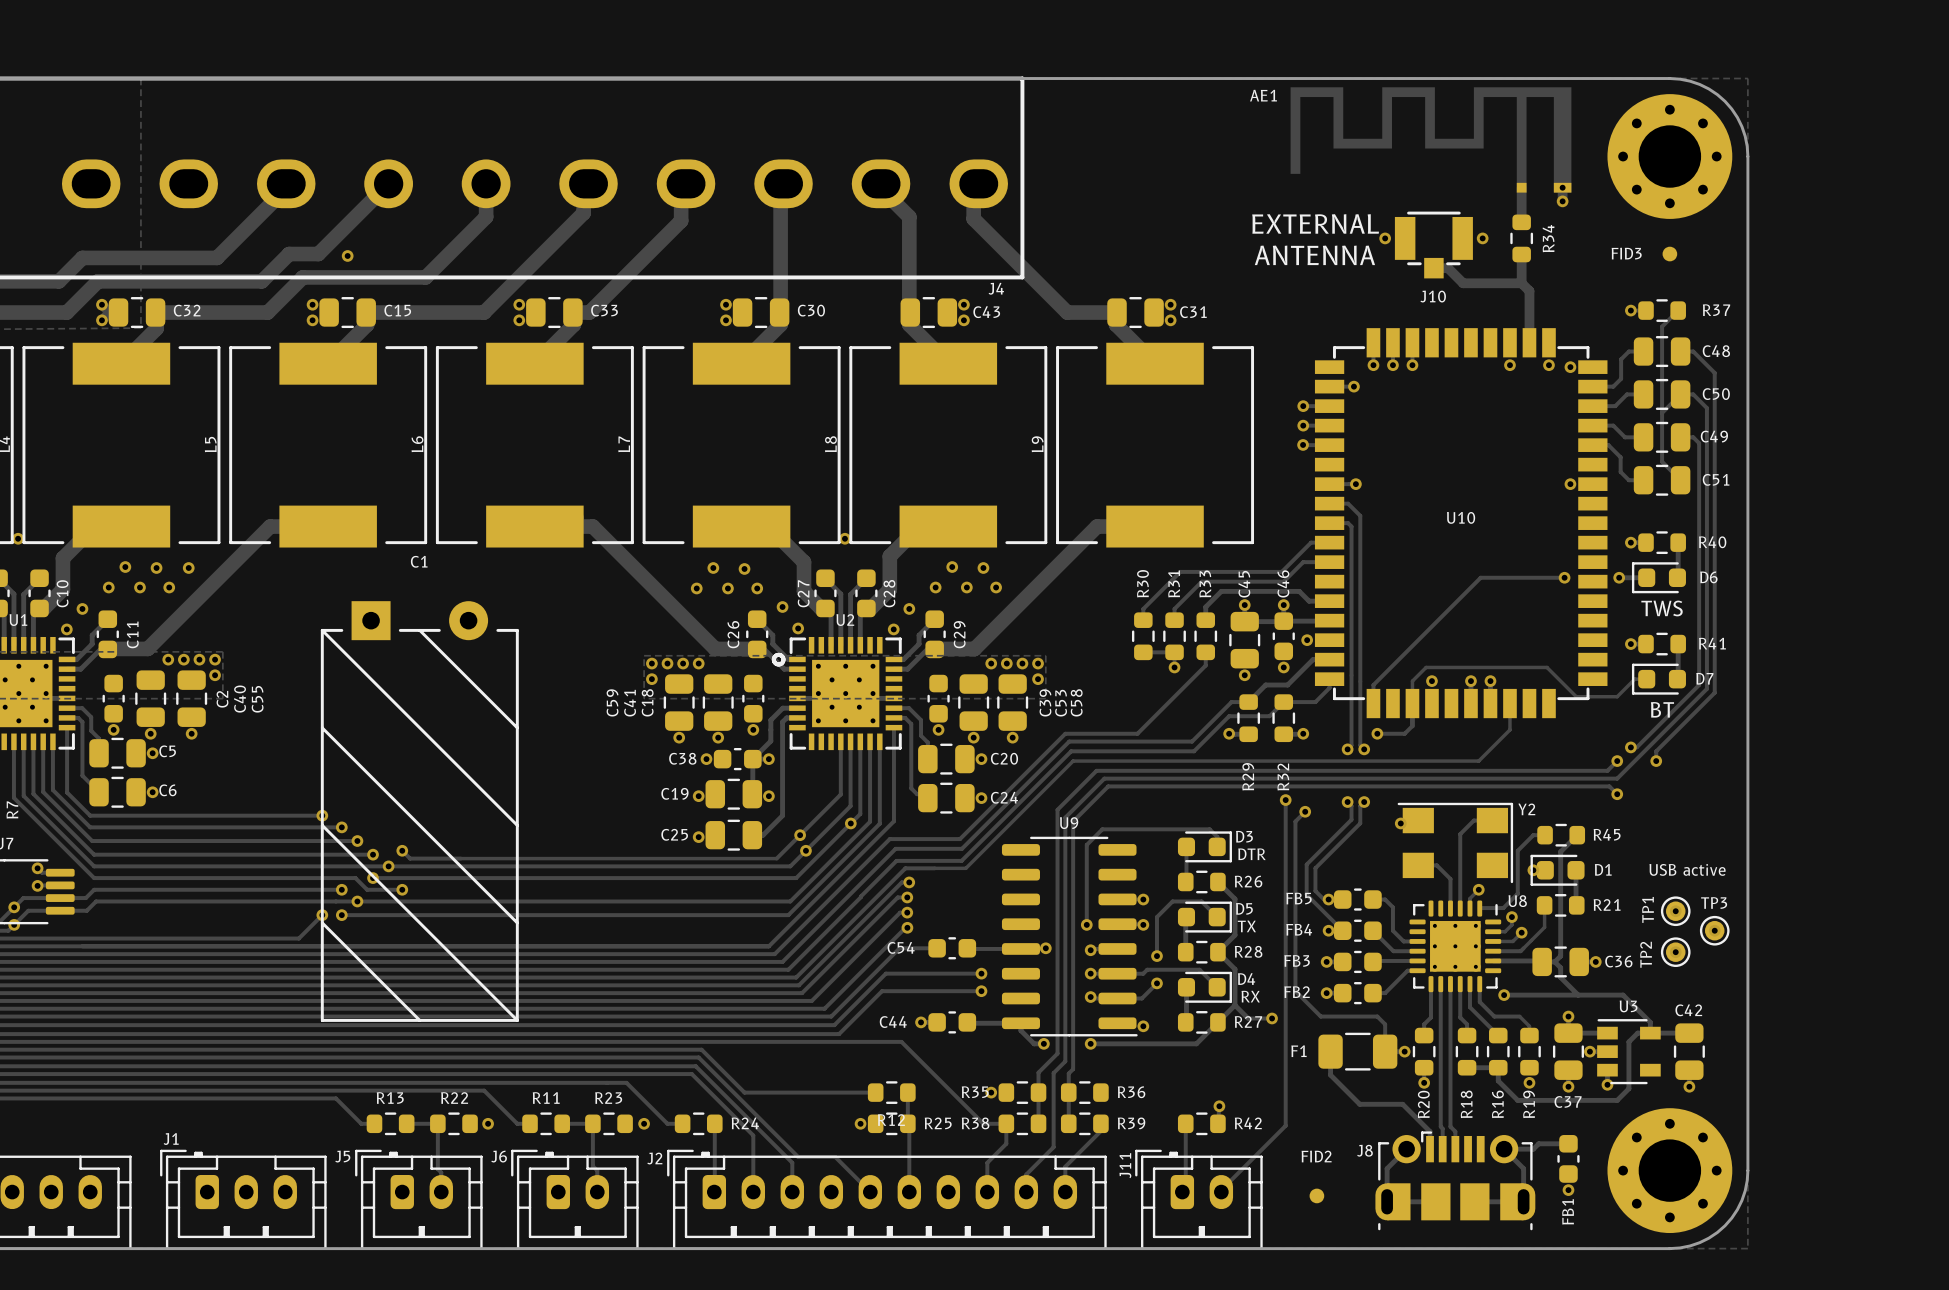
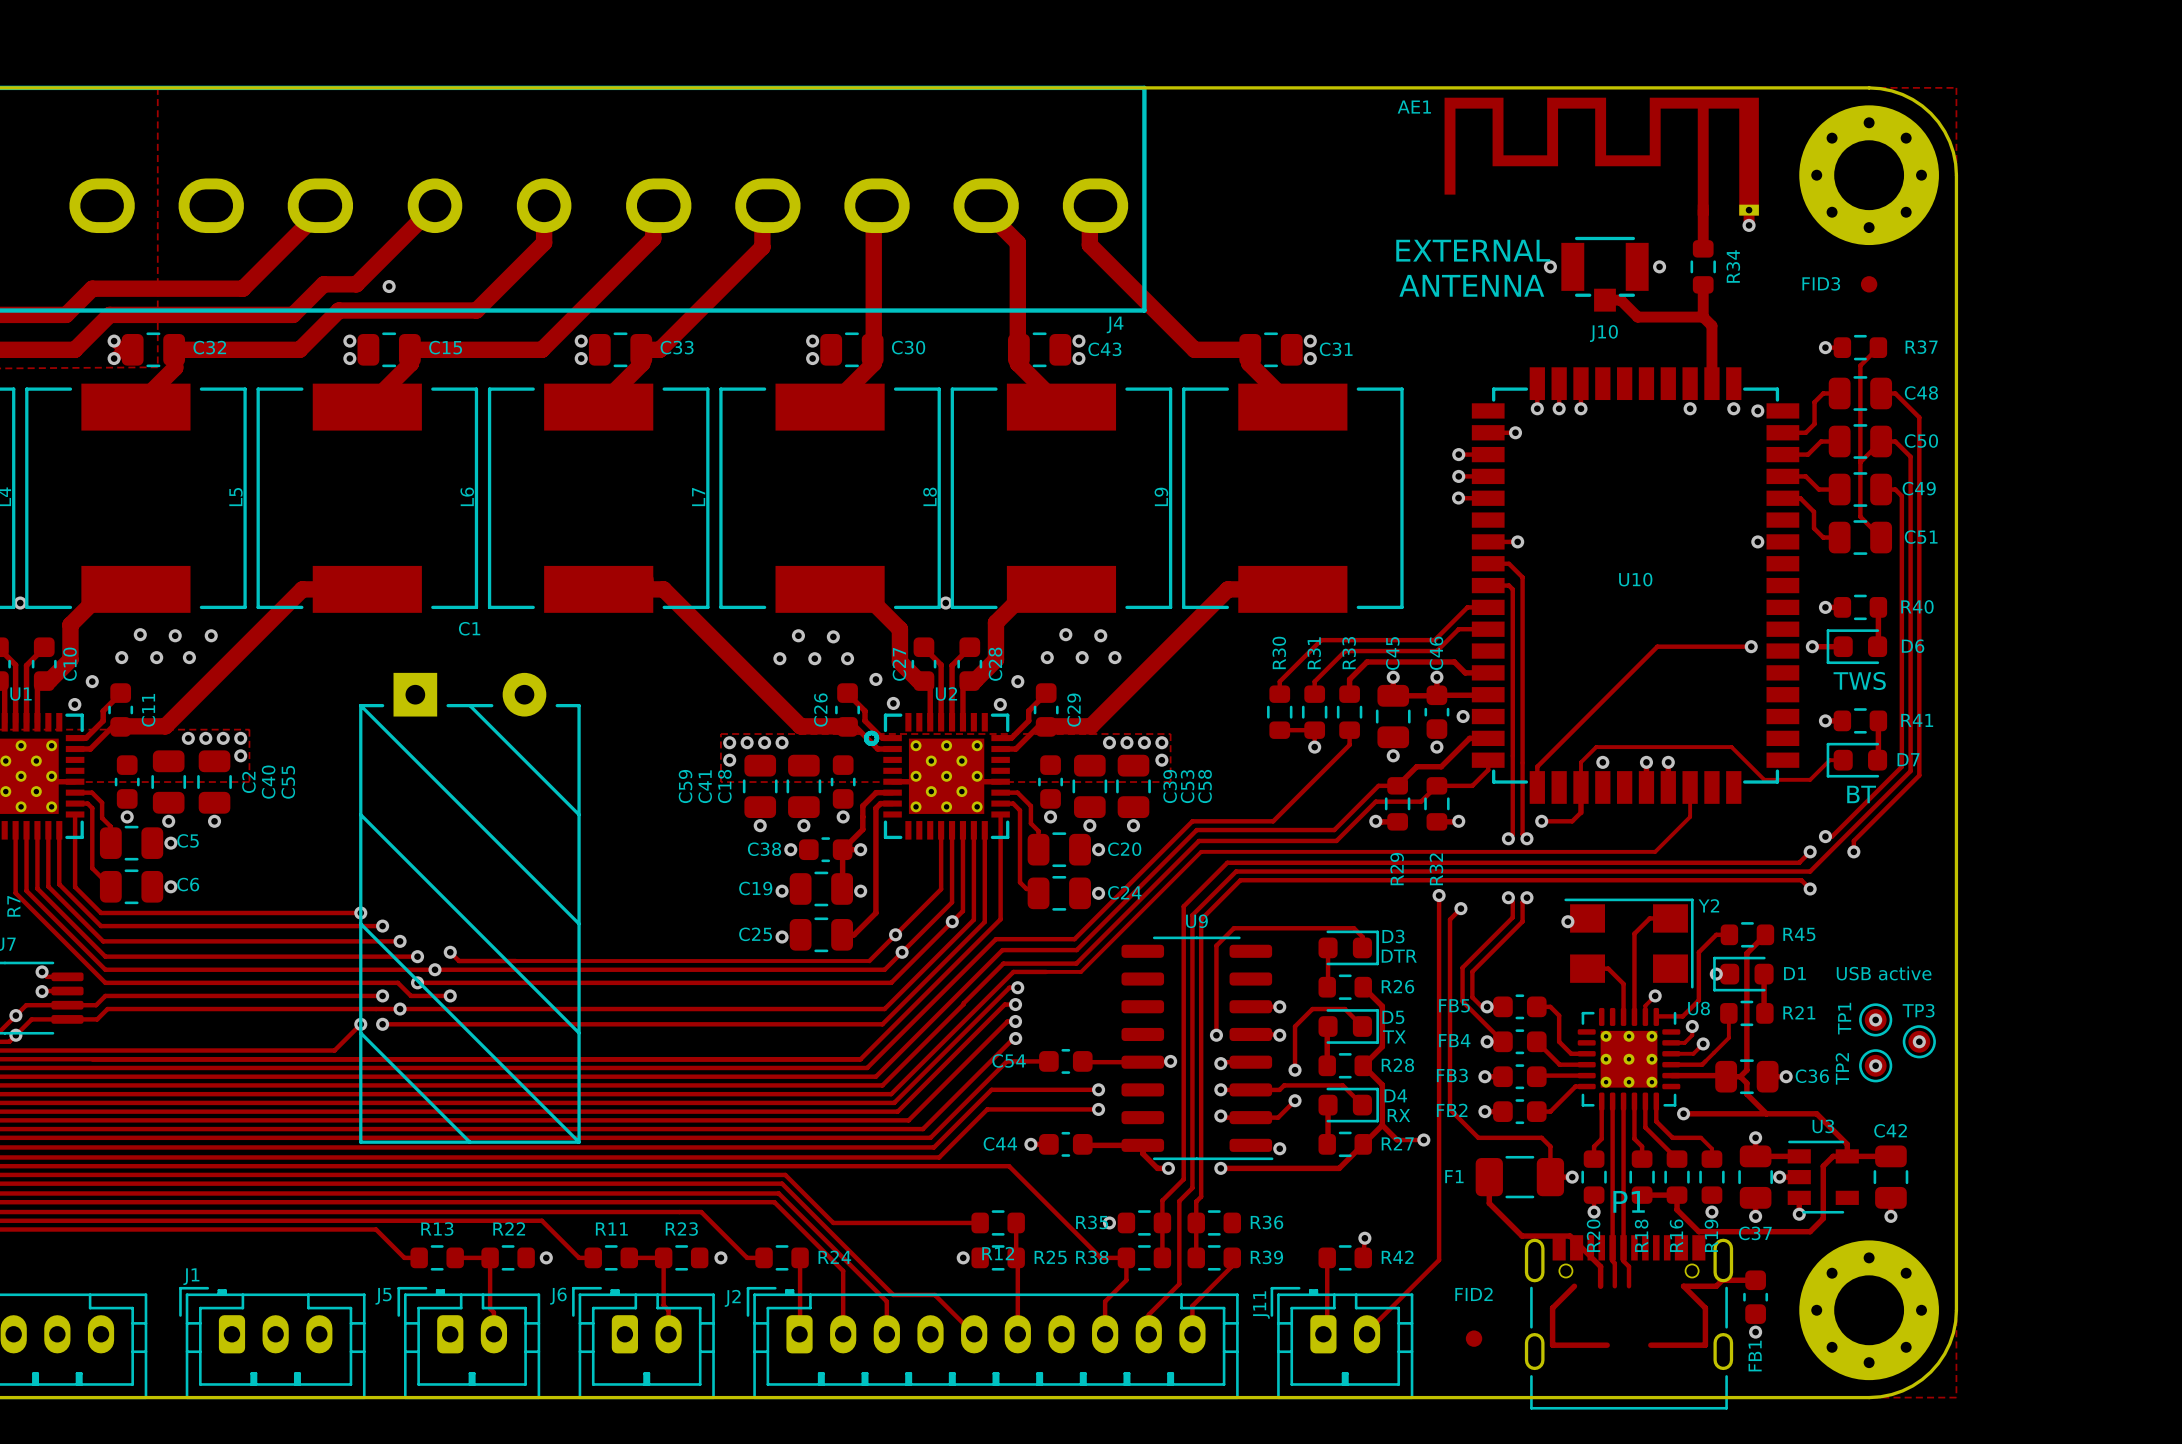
J8: (1455, 1180) -> none
P1: none -> (1629, 1322)

